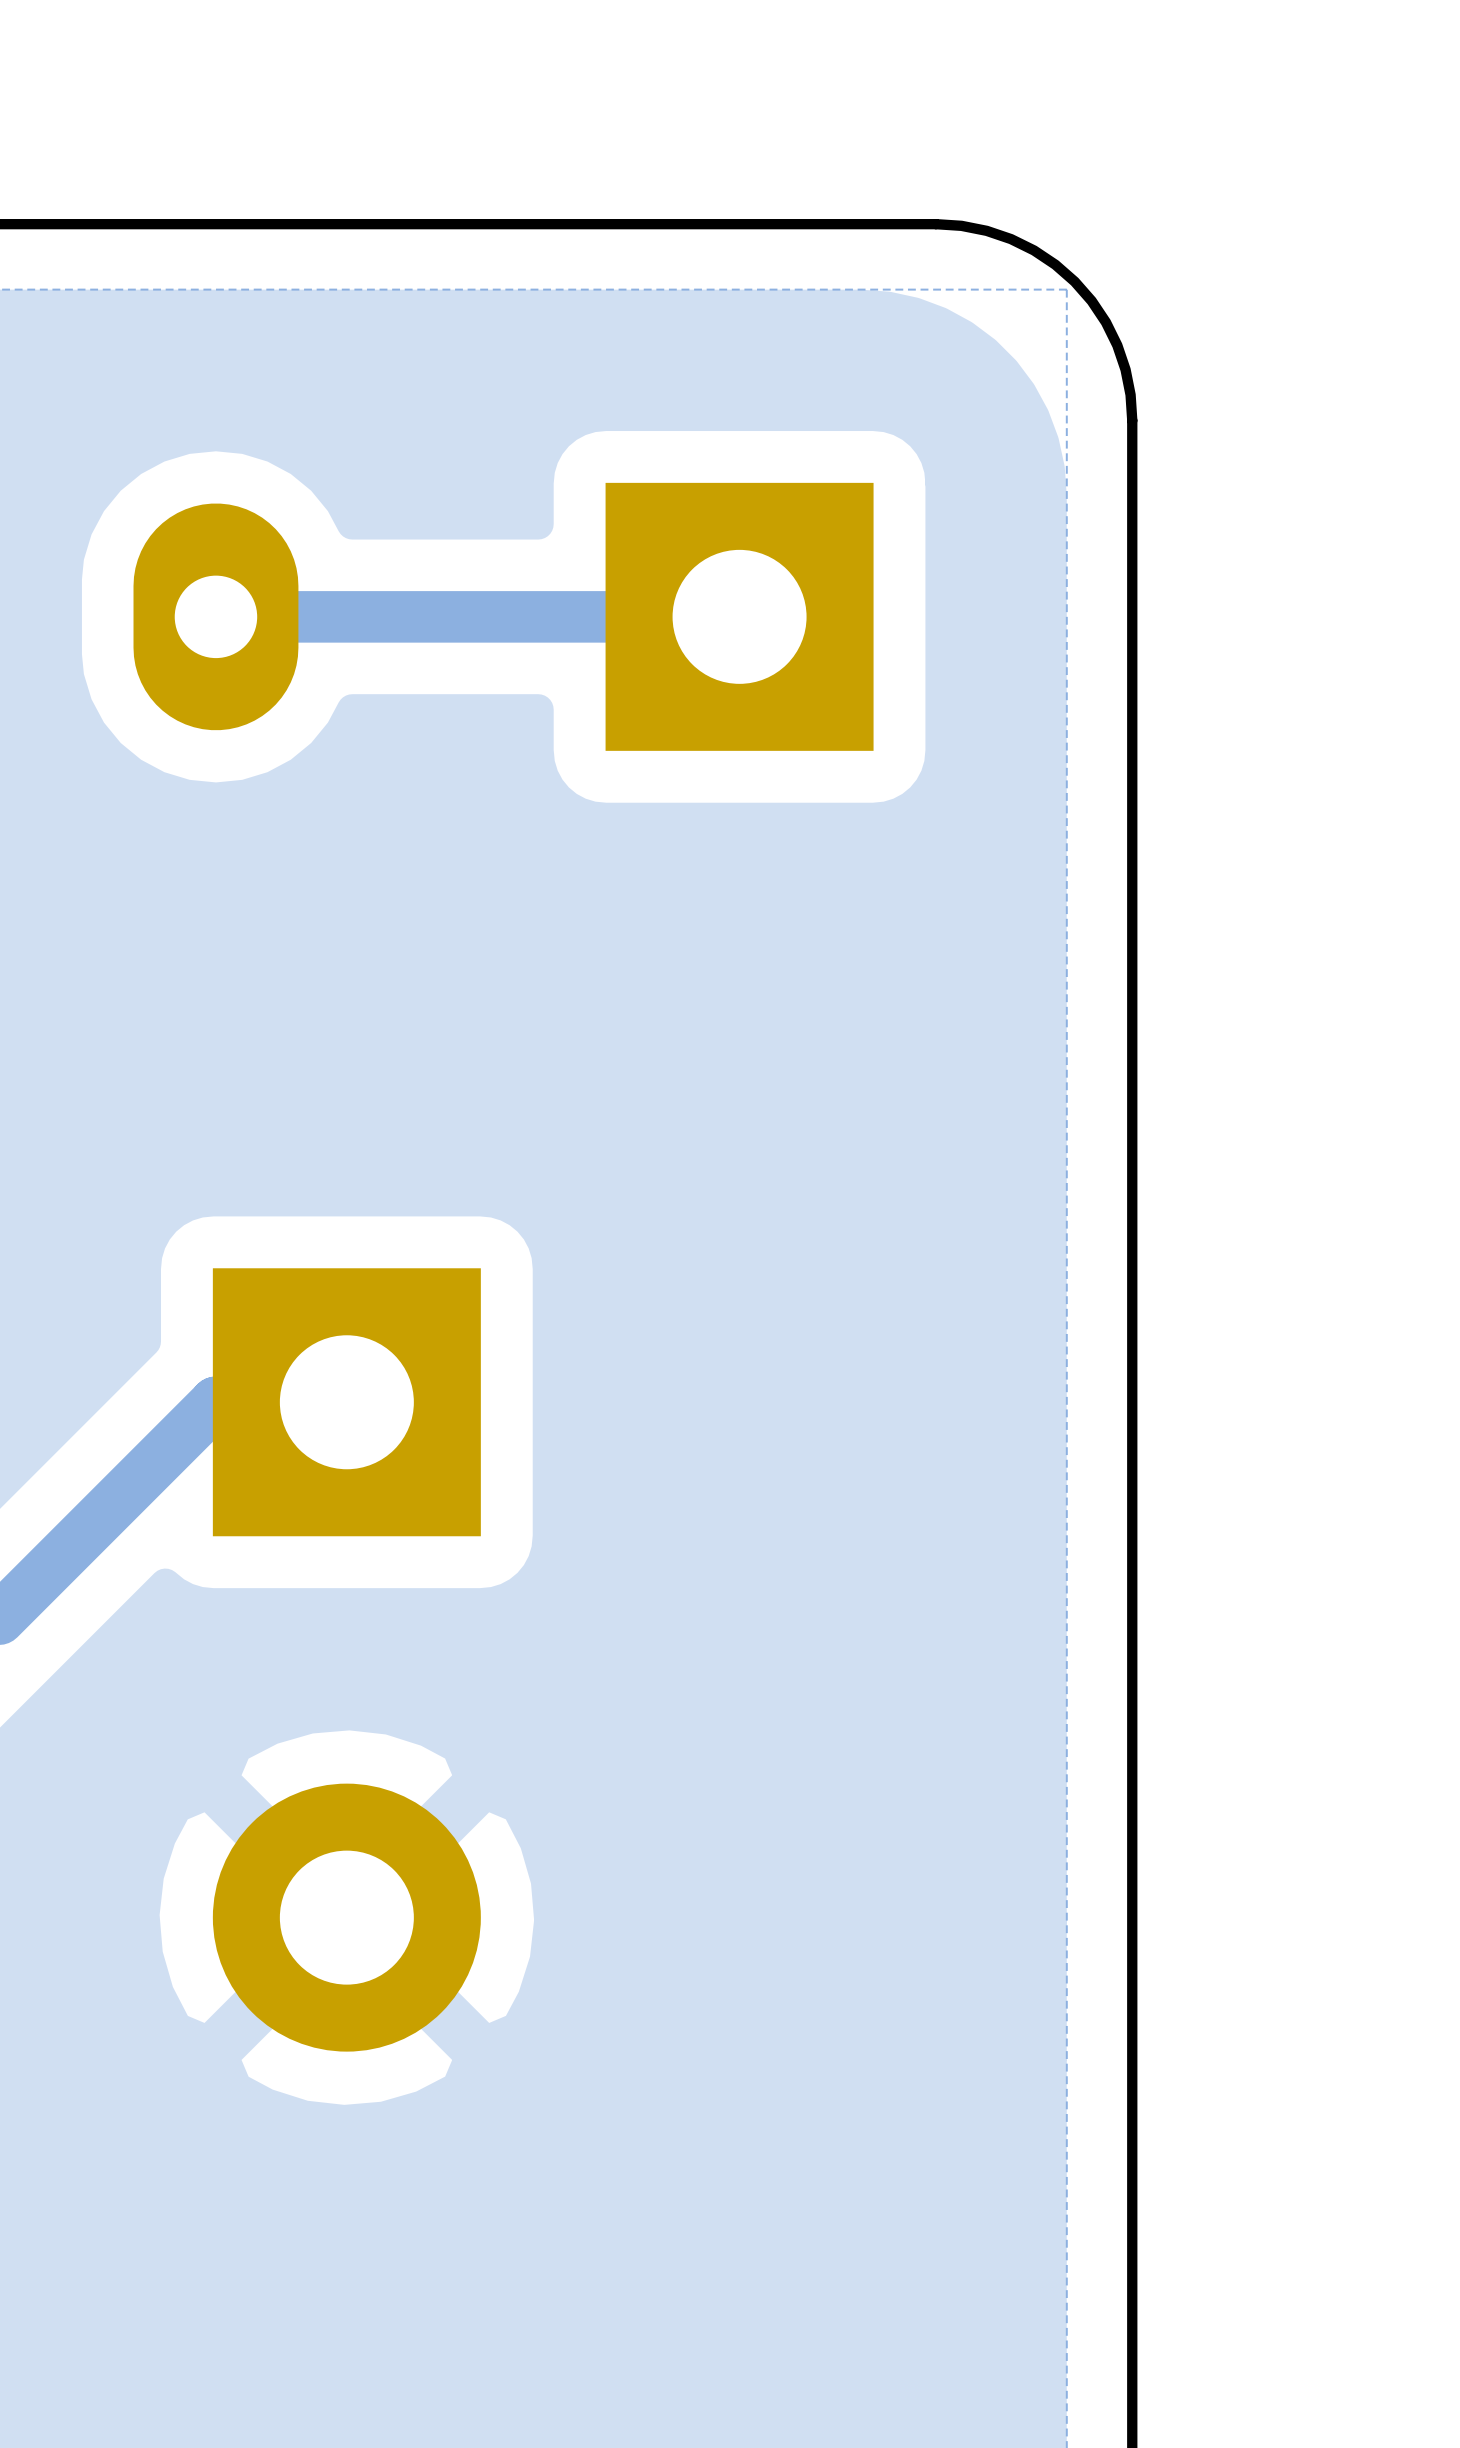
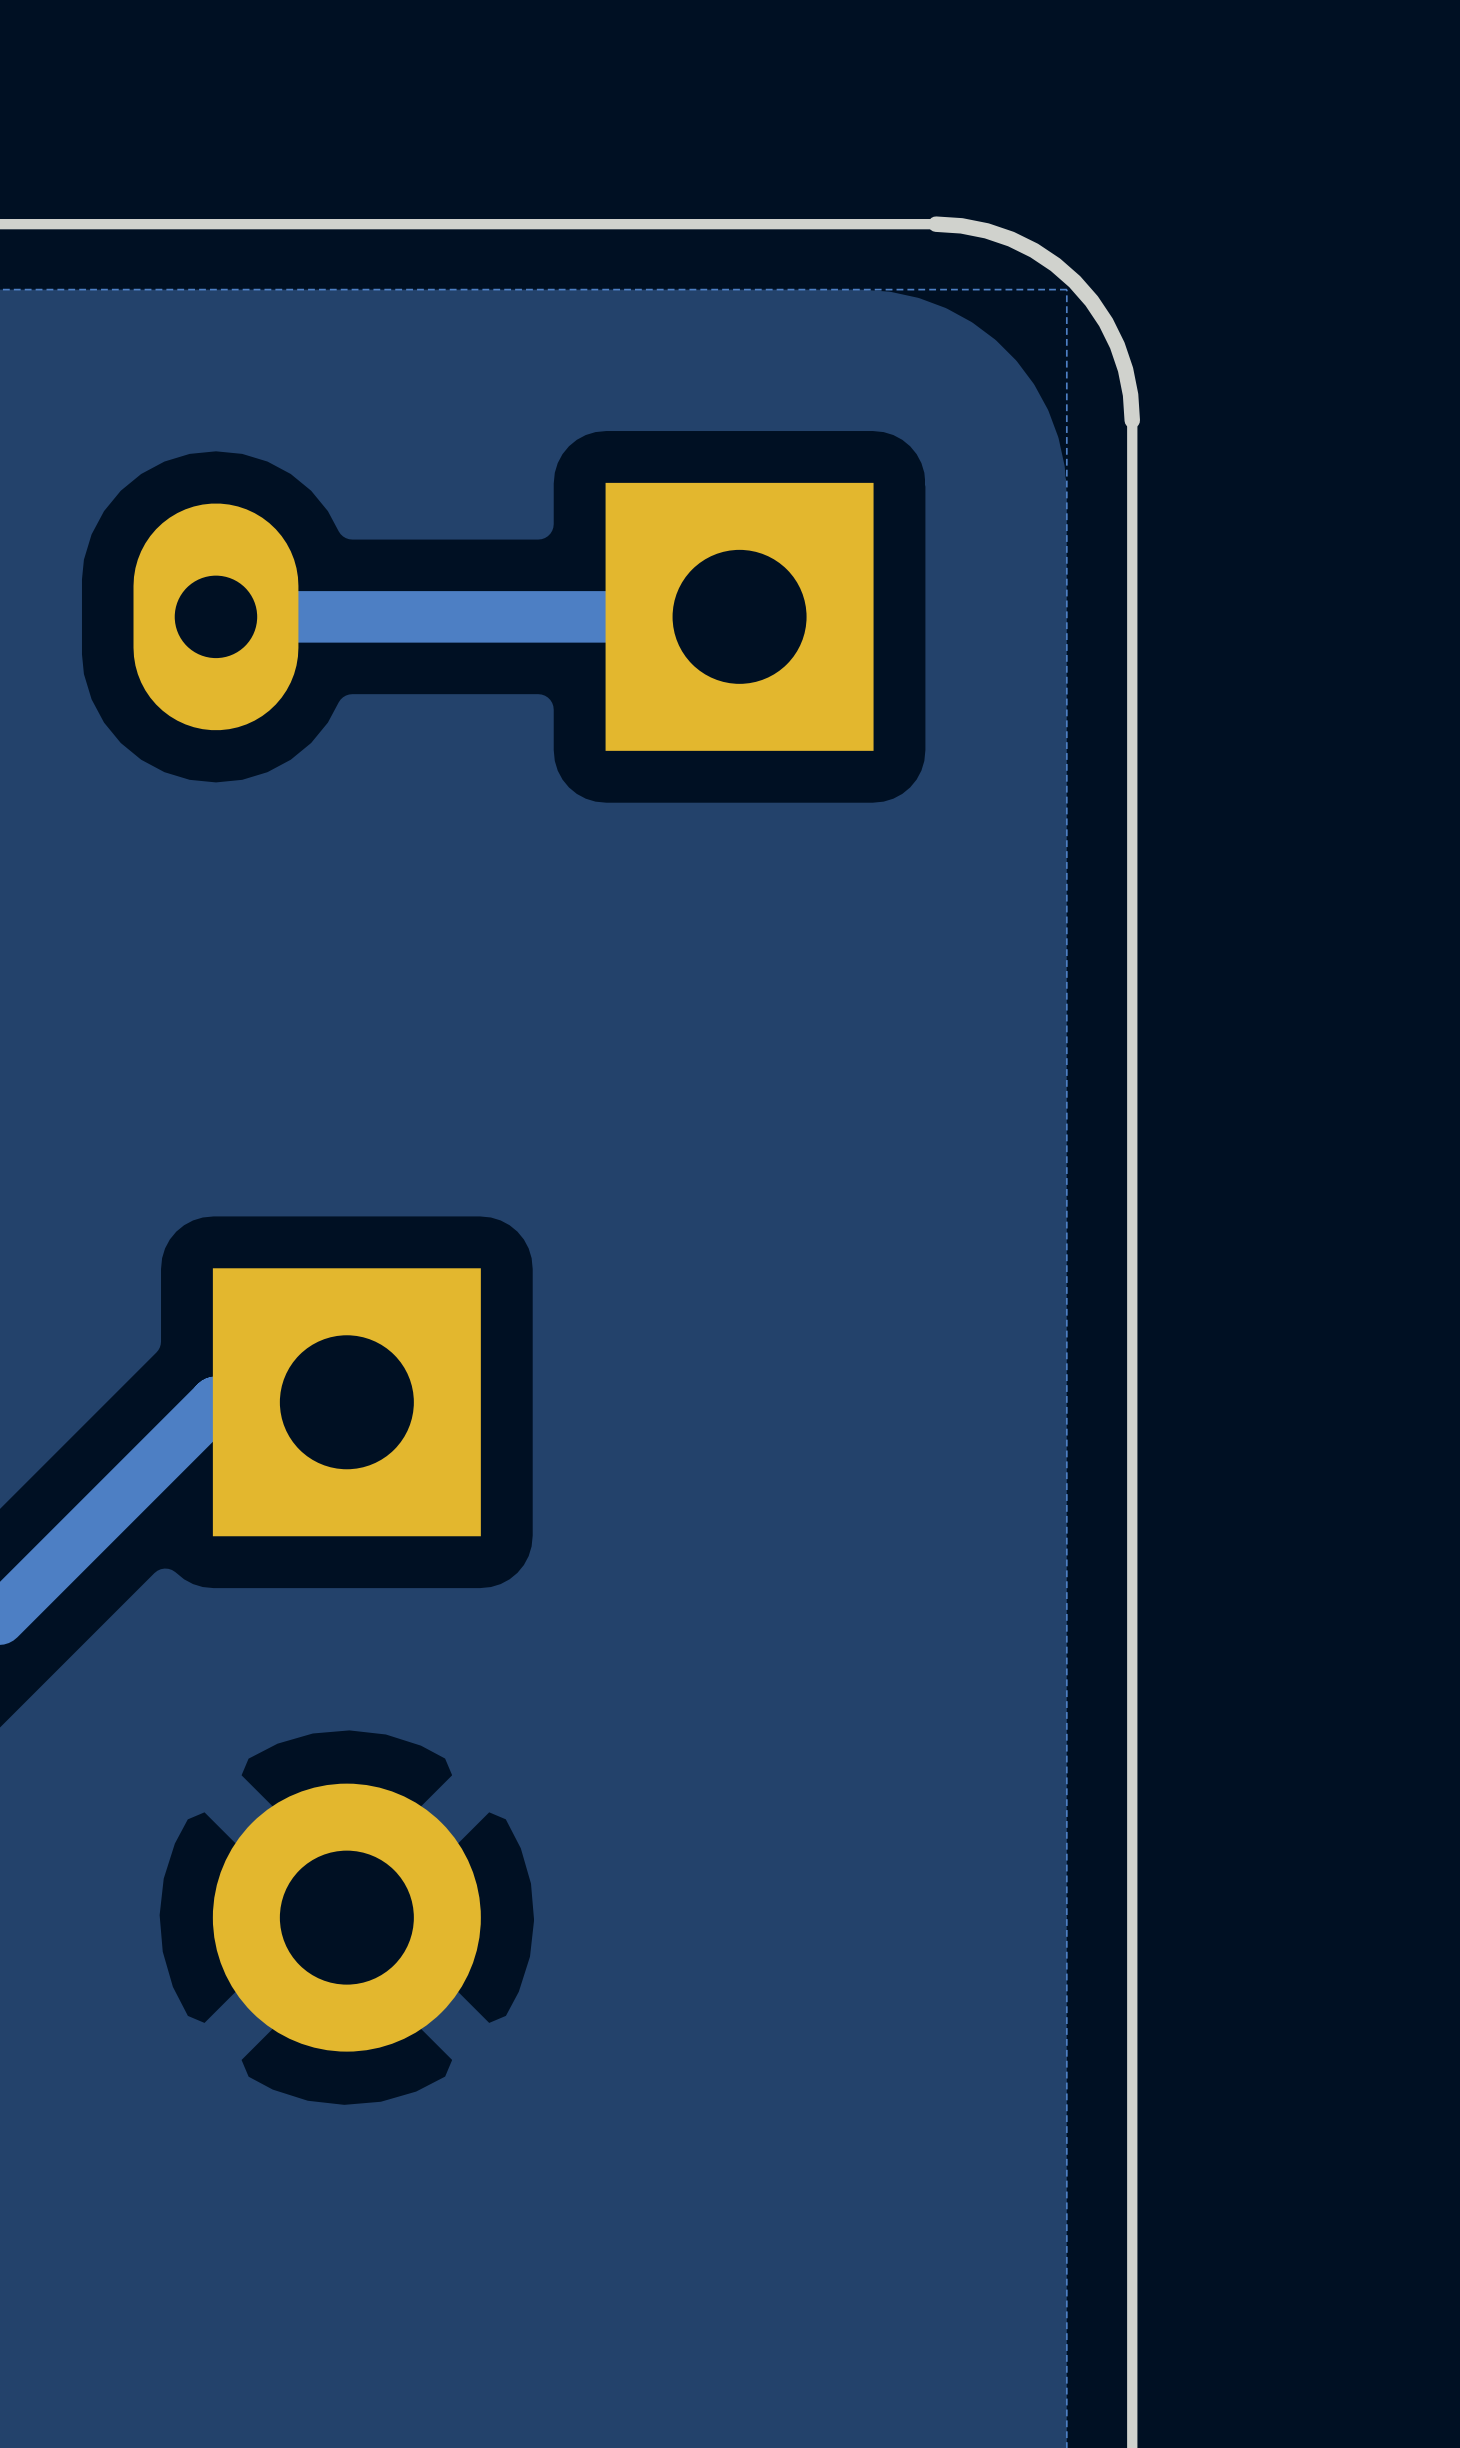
board edge width: thin (935, 224) (961, 225) (986, 230) (1011, 239) (1034, 250) (1055, 264) (1074, 281) (1091, 300) (1105, 322) (1117, 345) (1125, 369) (1130, 394) (1132, 420) -> thick (935, 224) (961, 225) (986, 230) (1011, 239) (1034, 250) (1055, 264) (1074, 281) (1091, 300) (1105, 322) (1117, 345) (1125, 369) (1130, 394) (1132, 420)

